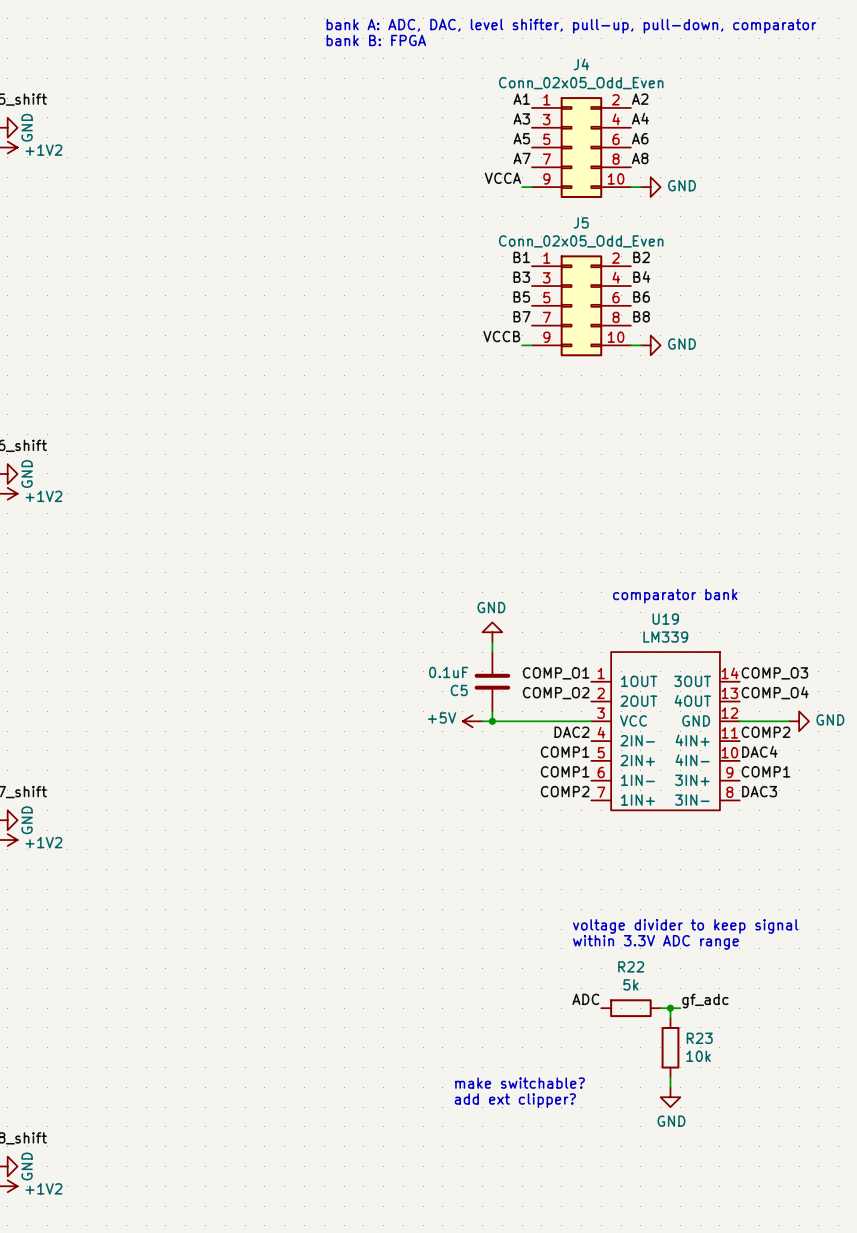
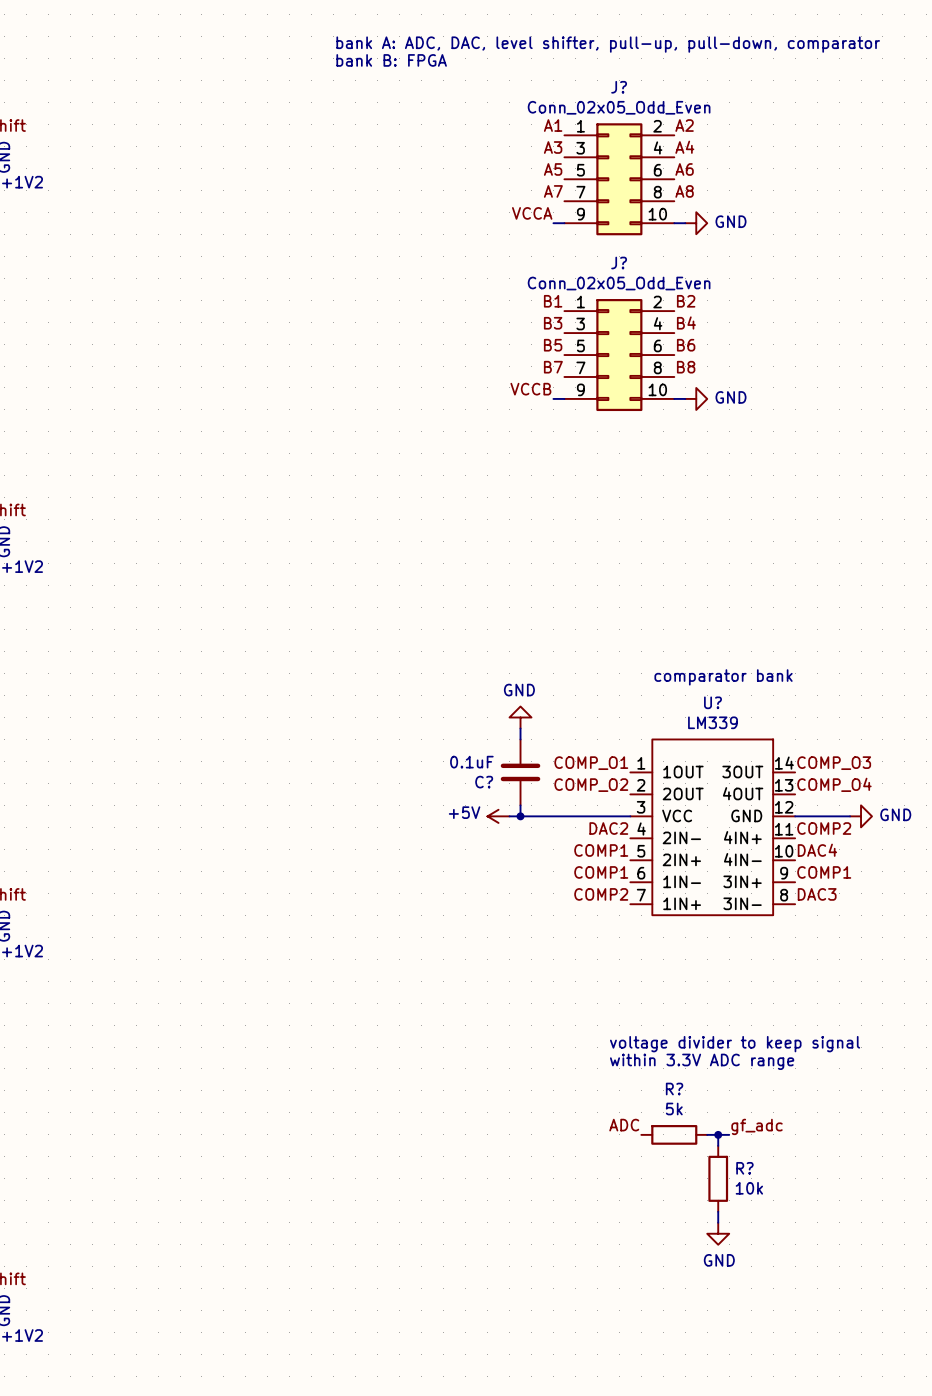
J4 name: J4 (581, 64) -> J? (619, 87)
J5 name: J5 (581, 222) -> J? (619, 263)
U19 name: U19 (665, 619) -> U? (712, 702)
C5 name: C5 (459, 690) -> C? (484, 782)
R22 name: R22 (631, 966) -> R? (674, 1089)
R23 name: R23 (699, 1038) -> R? (744, 1168)
text: make switchable? (520, 1083) -> none
text: add ext clipper? (515, 1100) -> none

